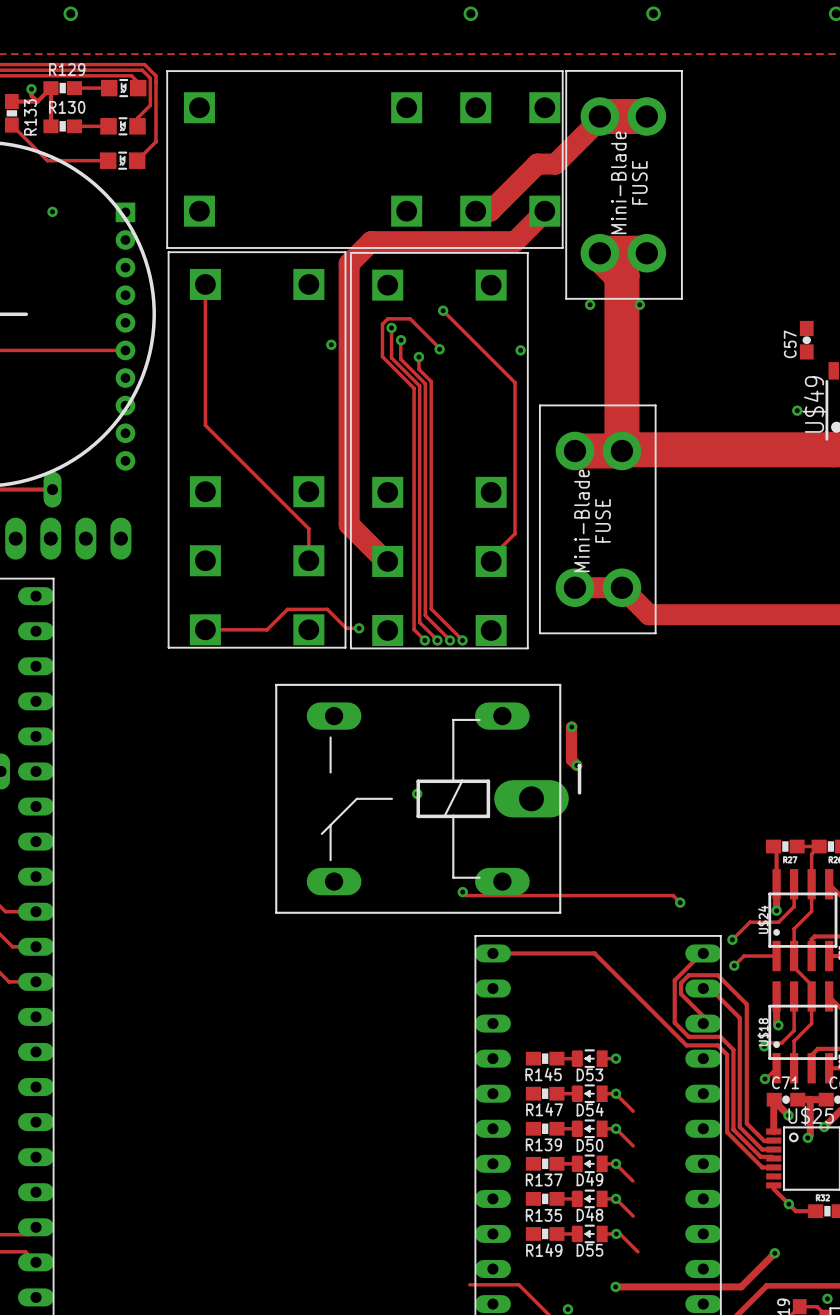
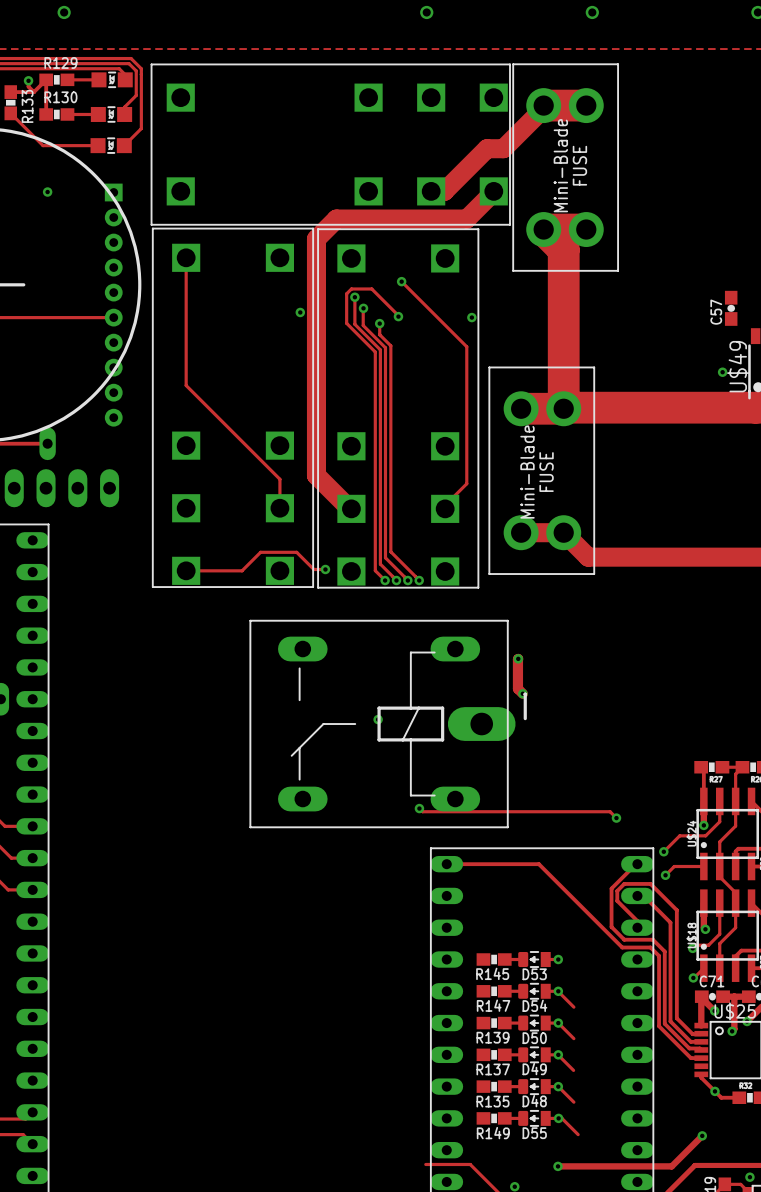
via: (590, 304) -> none
via: (639, 304) -> none

